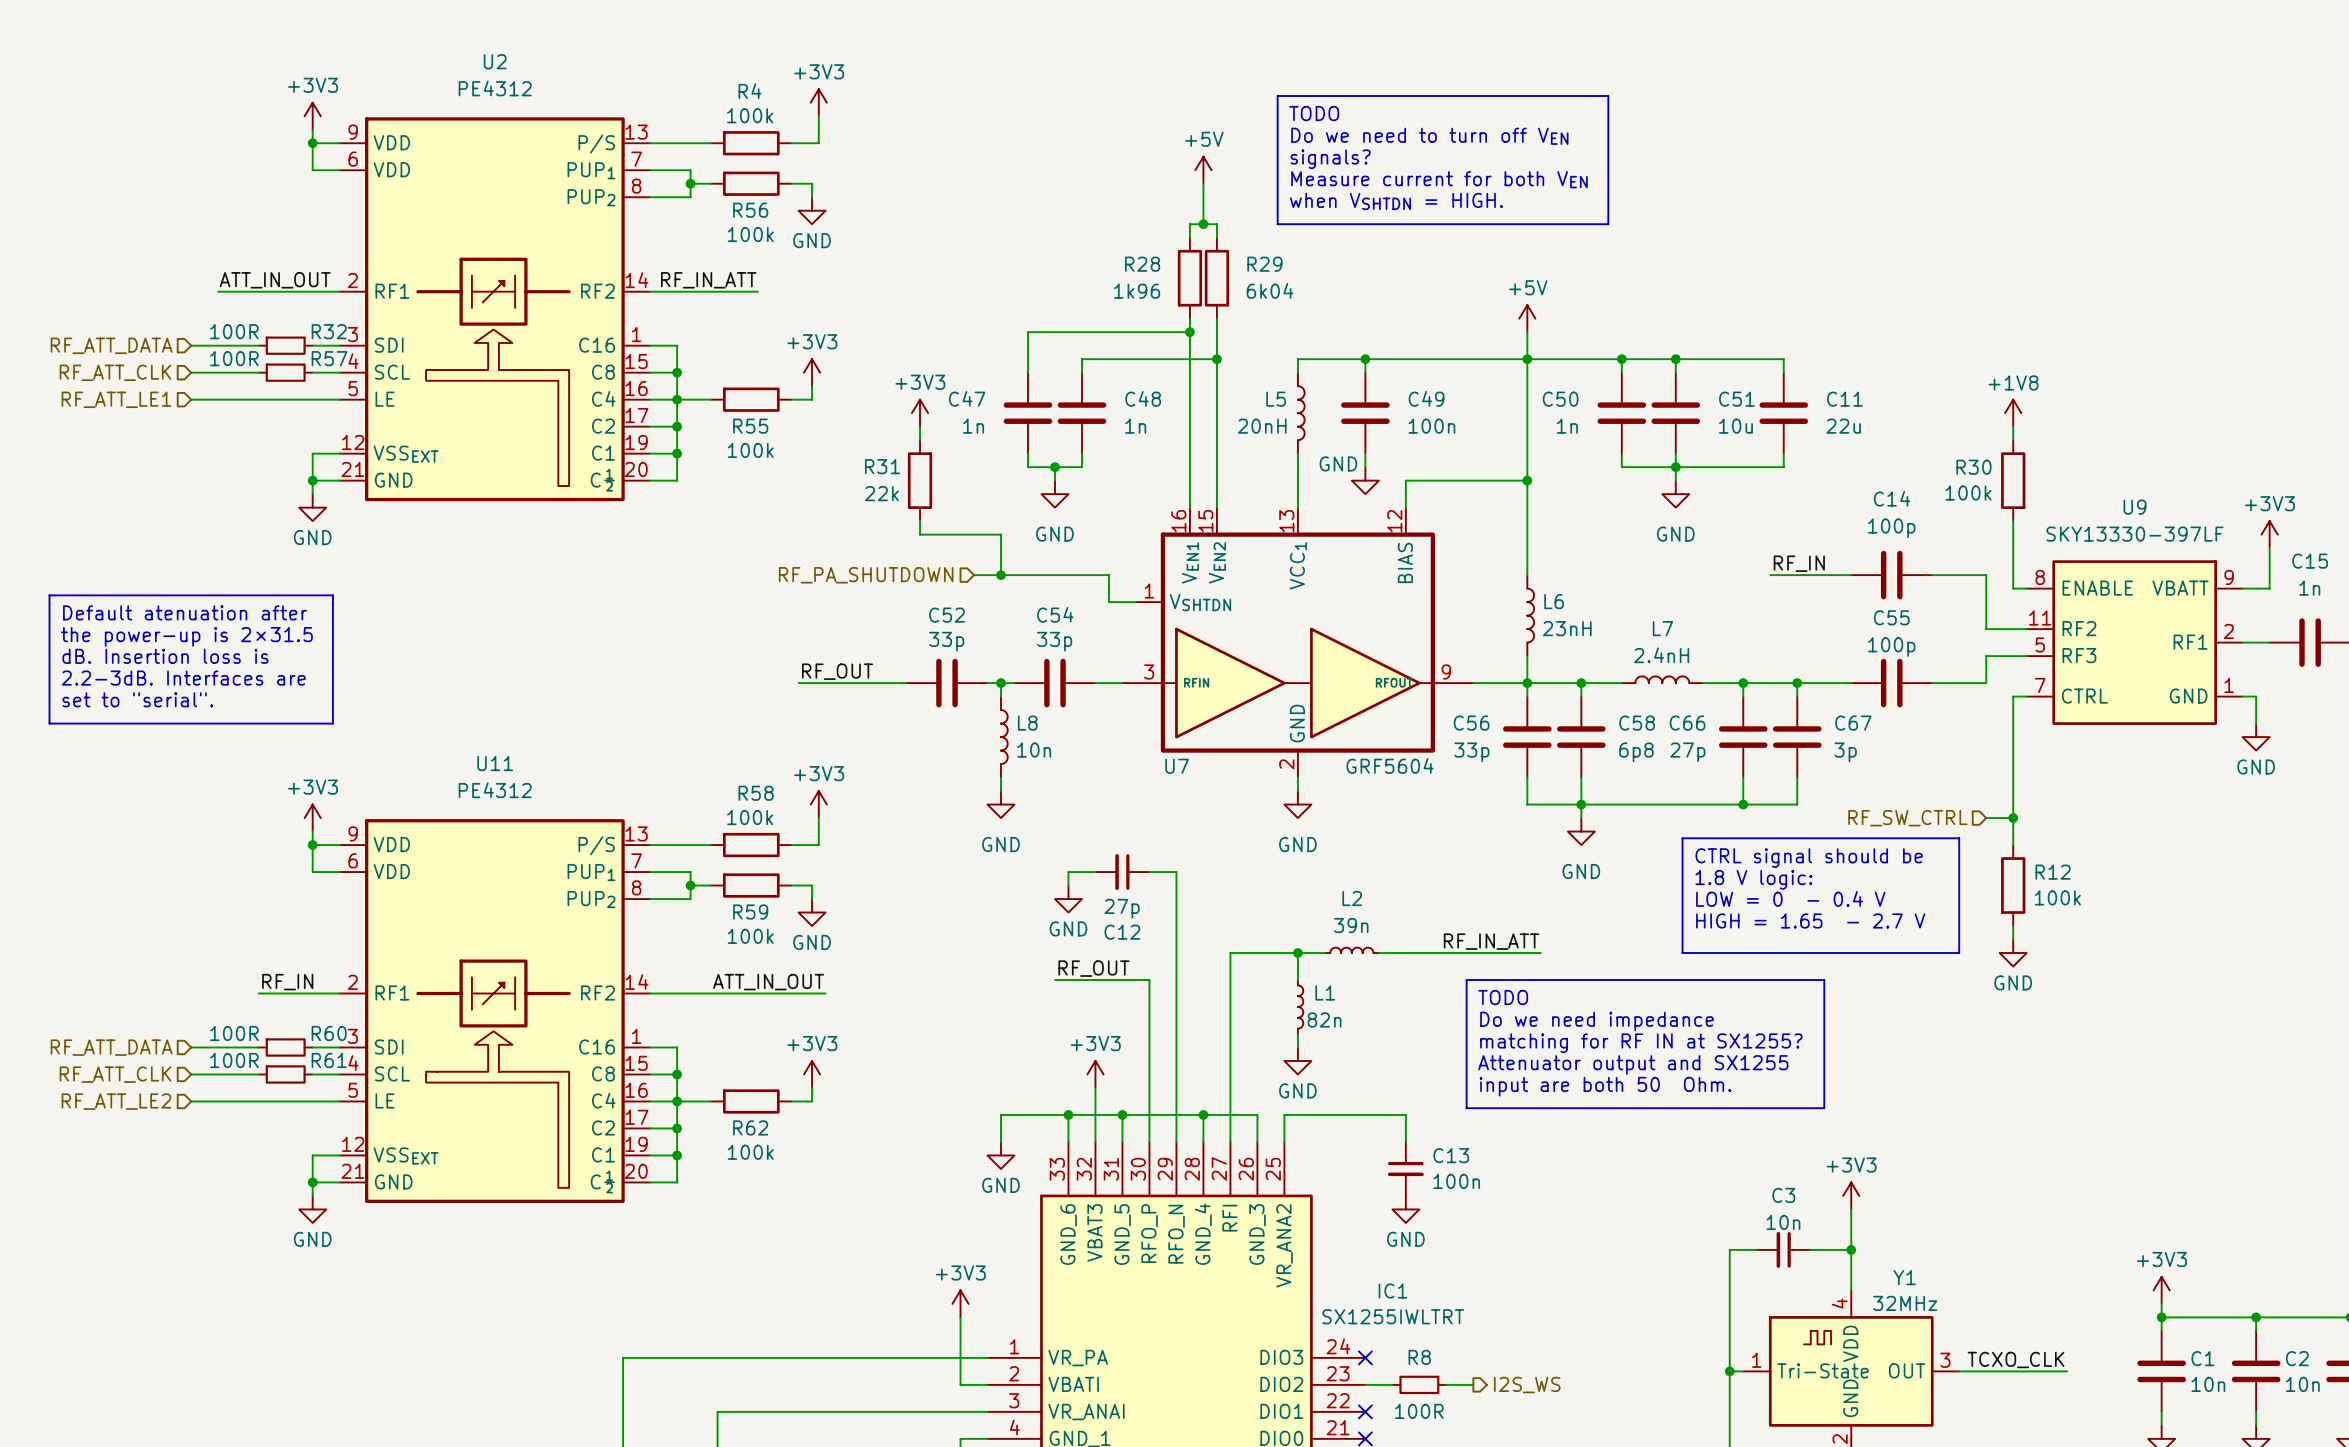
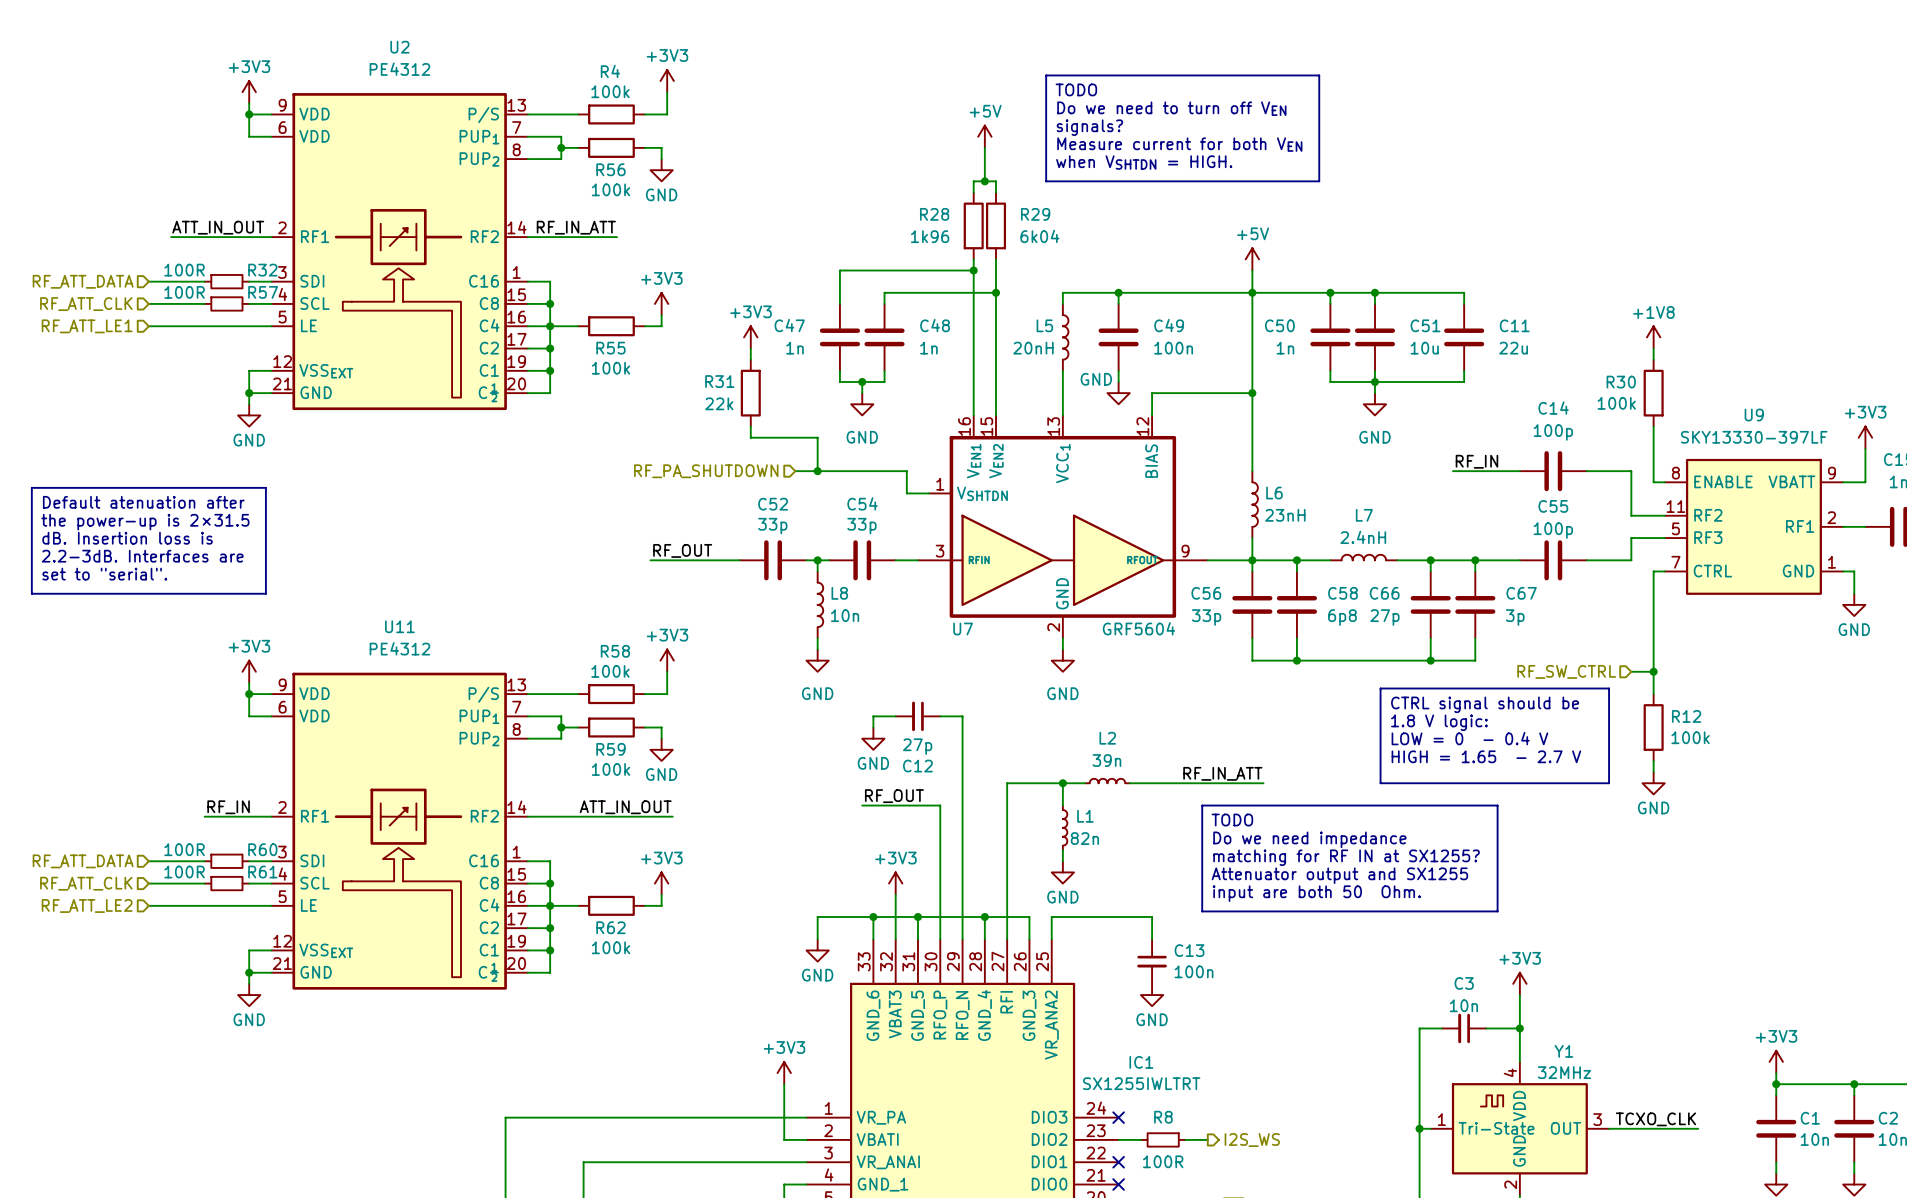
wire: (1581, 804) (1581, 818) -> none
power symbol: GND (1581, 831) -> none

